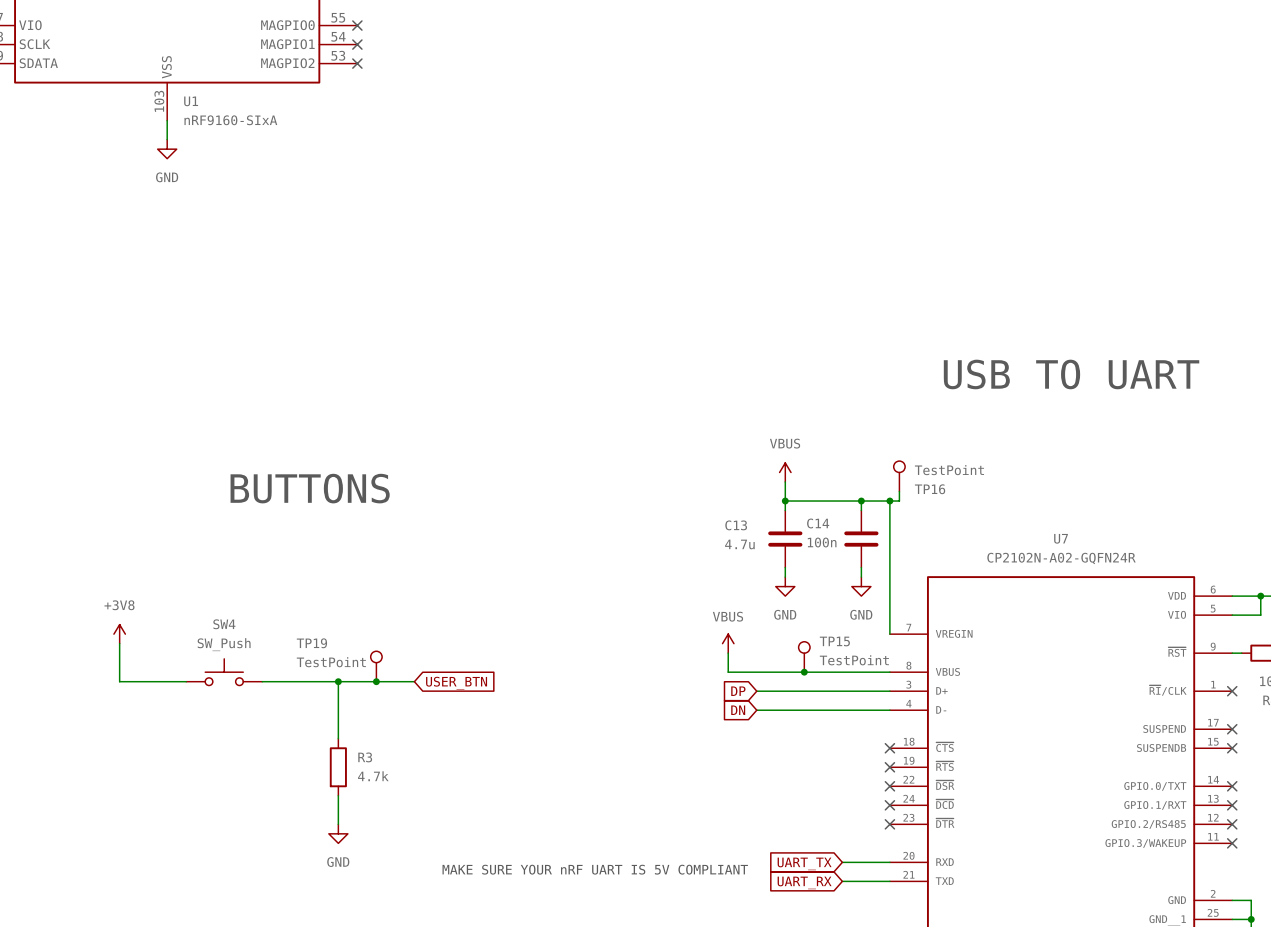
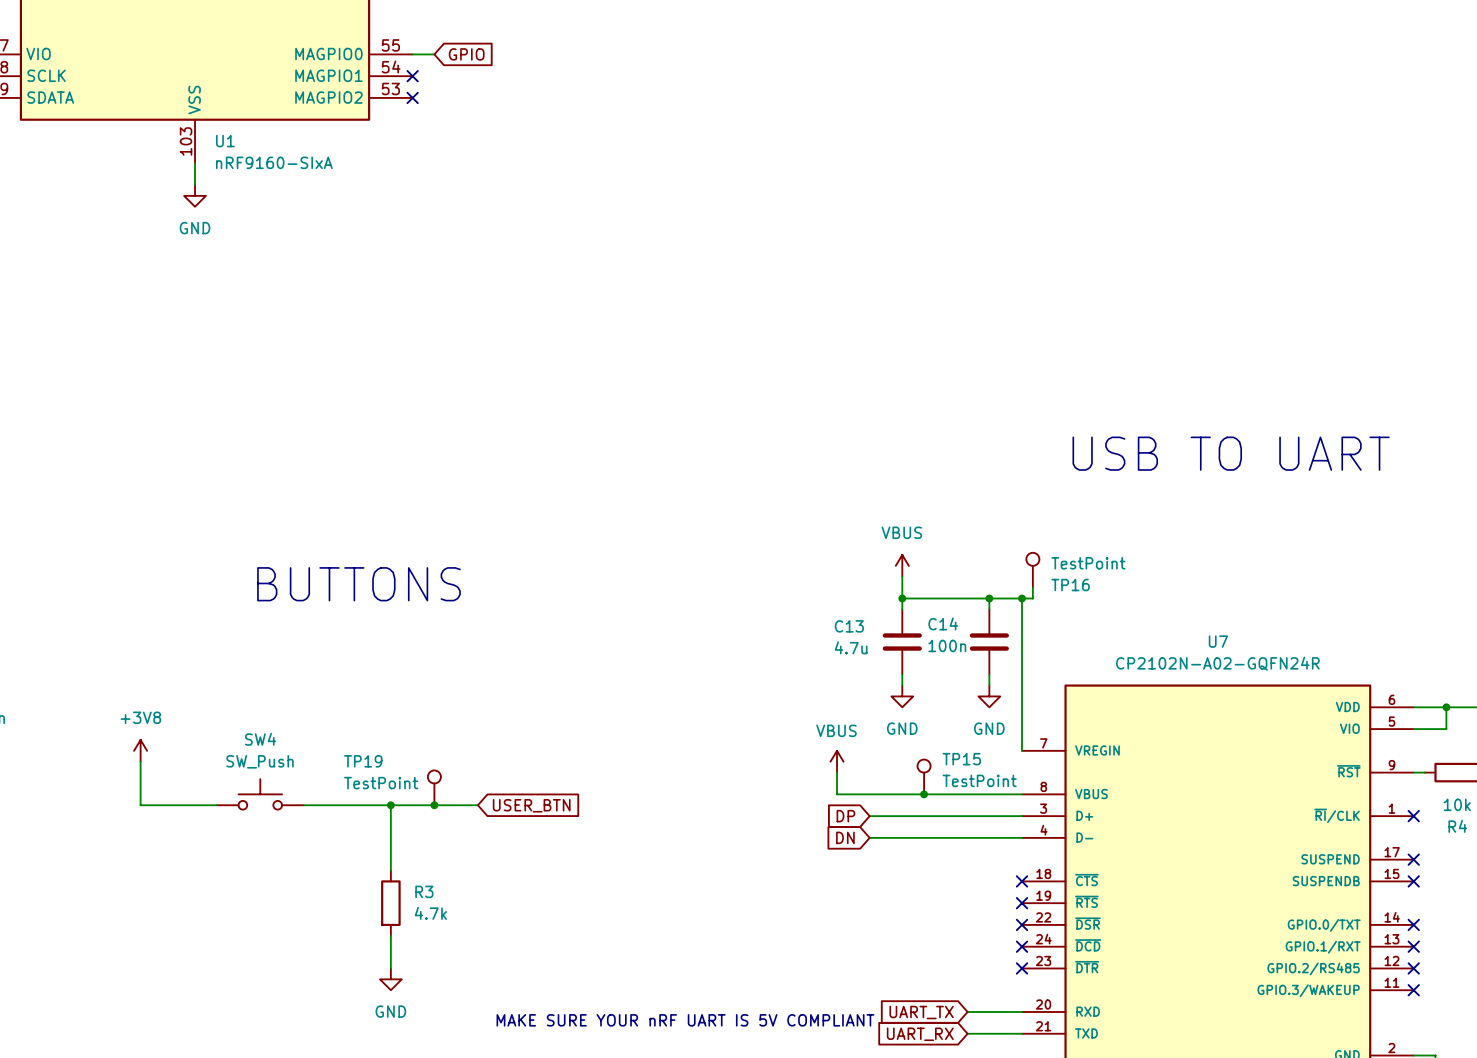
wire: none -> (412, 54) (434, 54)
no-connect mark: (357, 25) -> none
global label: none -> GPIO (466, 54)

